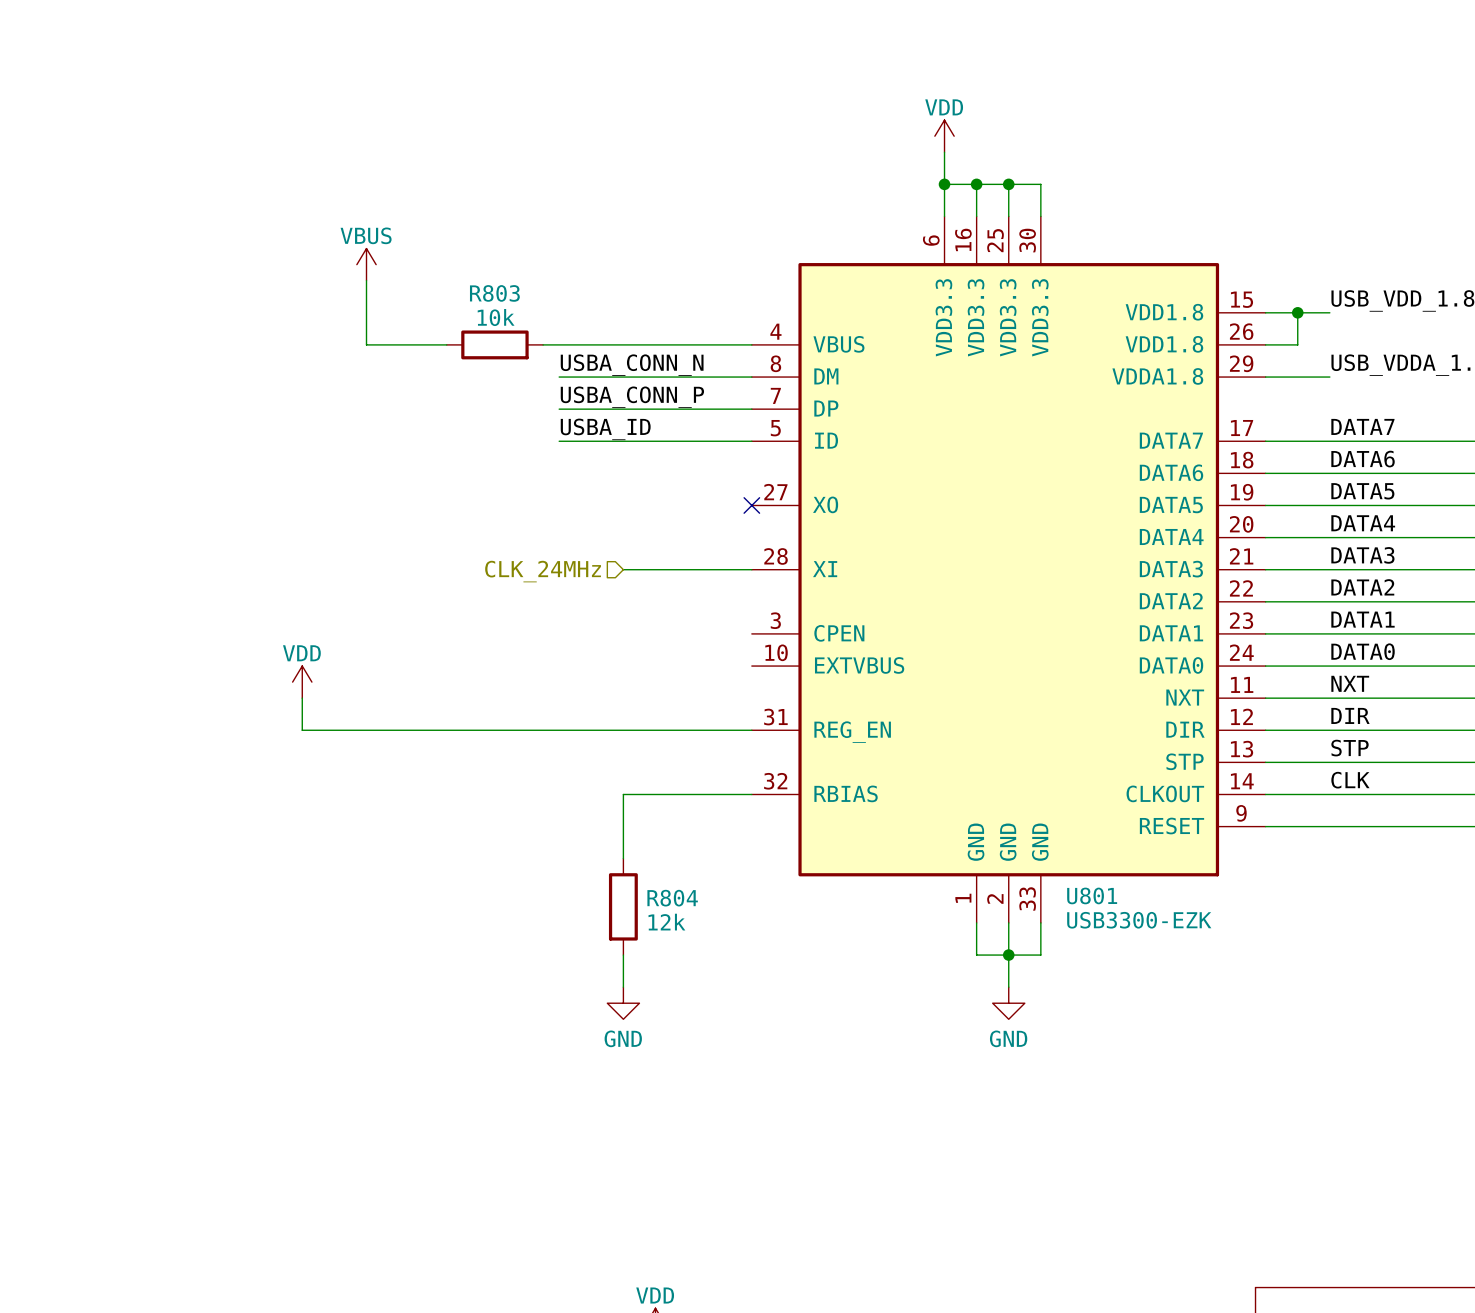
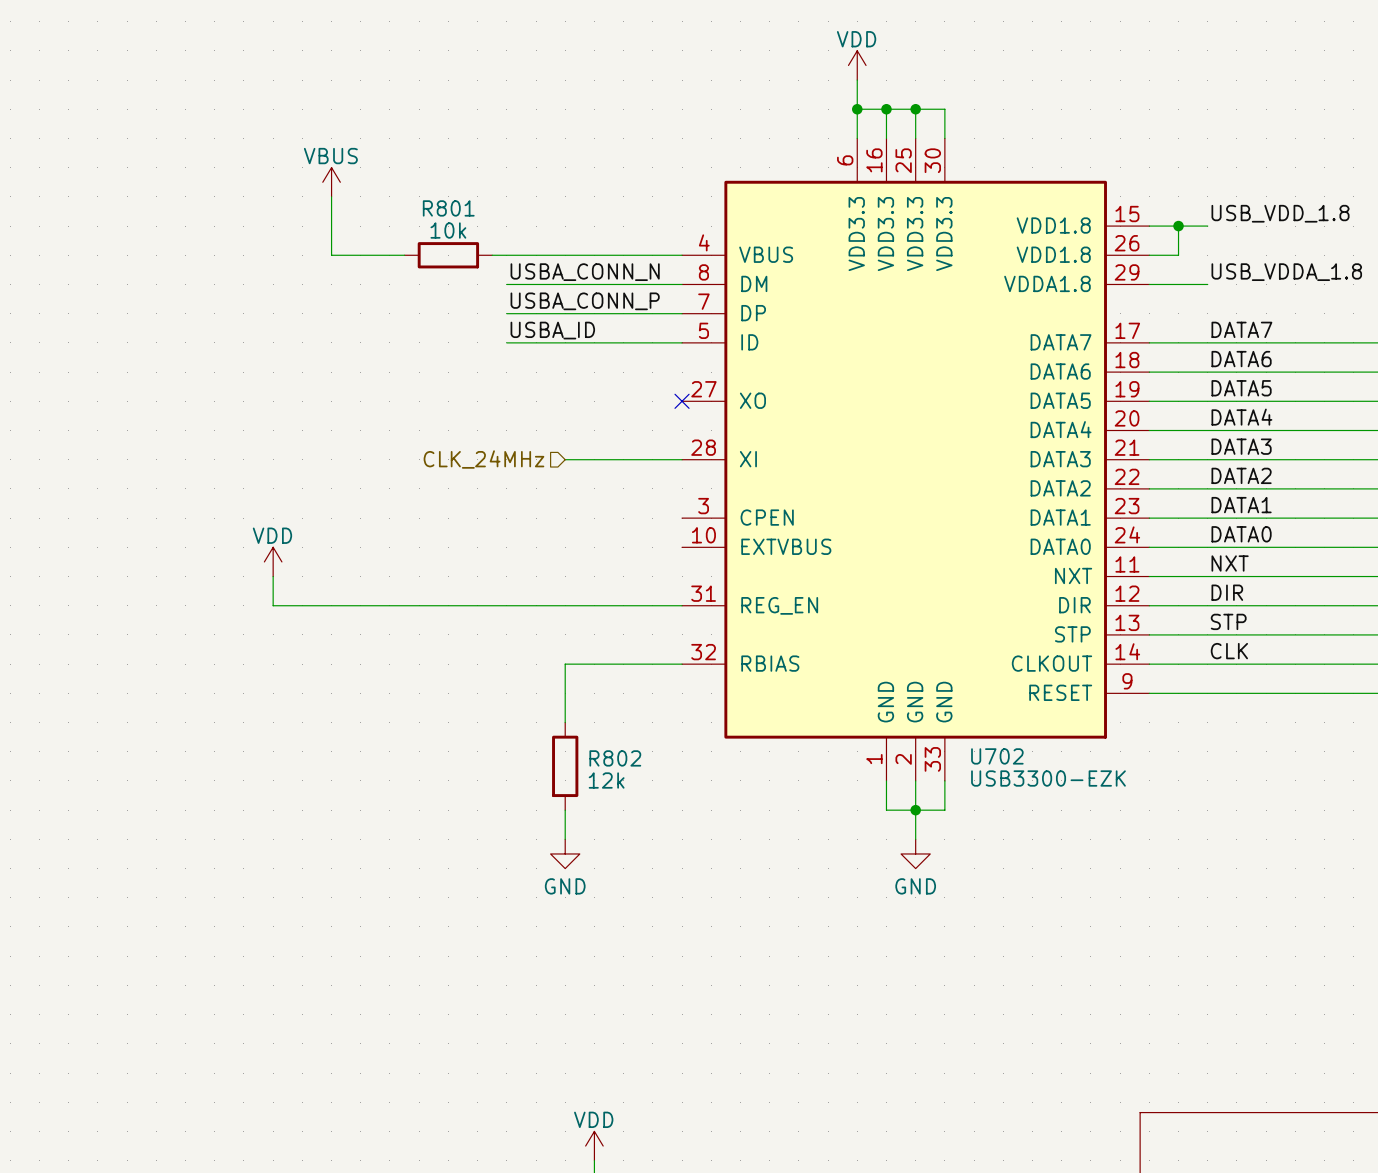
R803 name: R803 (494, 293) -> R801 (448, 208)
U801 name: U801 (1092, 895) -> U702 (997, 756)
R804 name: R804 (672, 898) -> R802 (615, 758)

